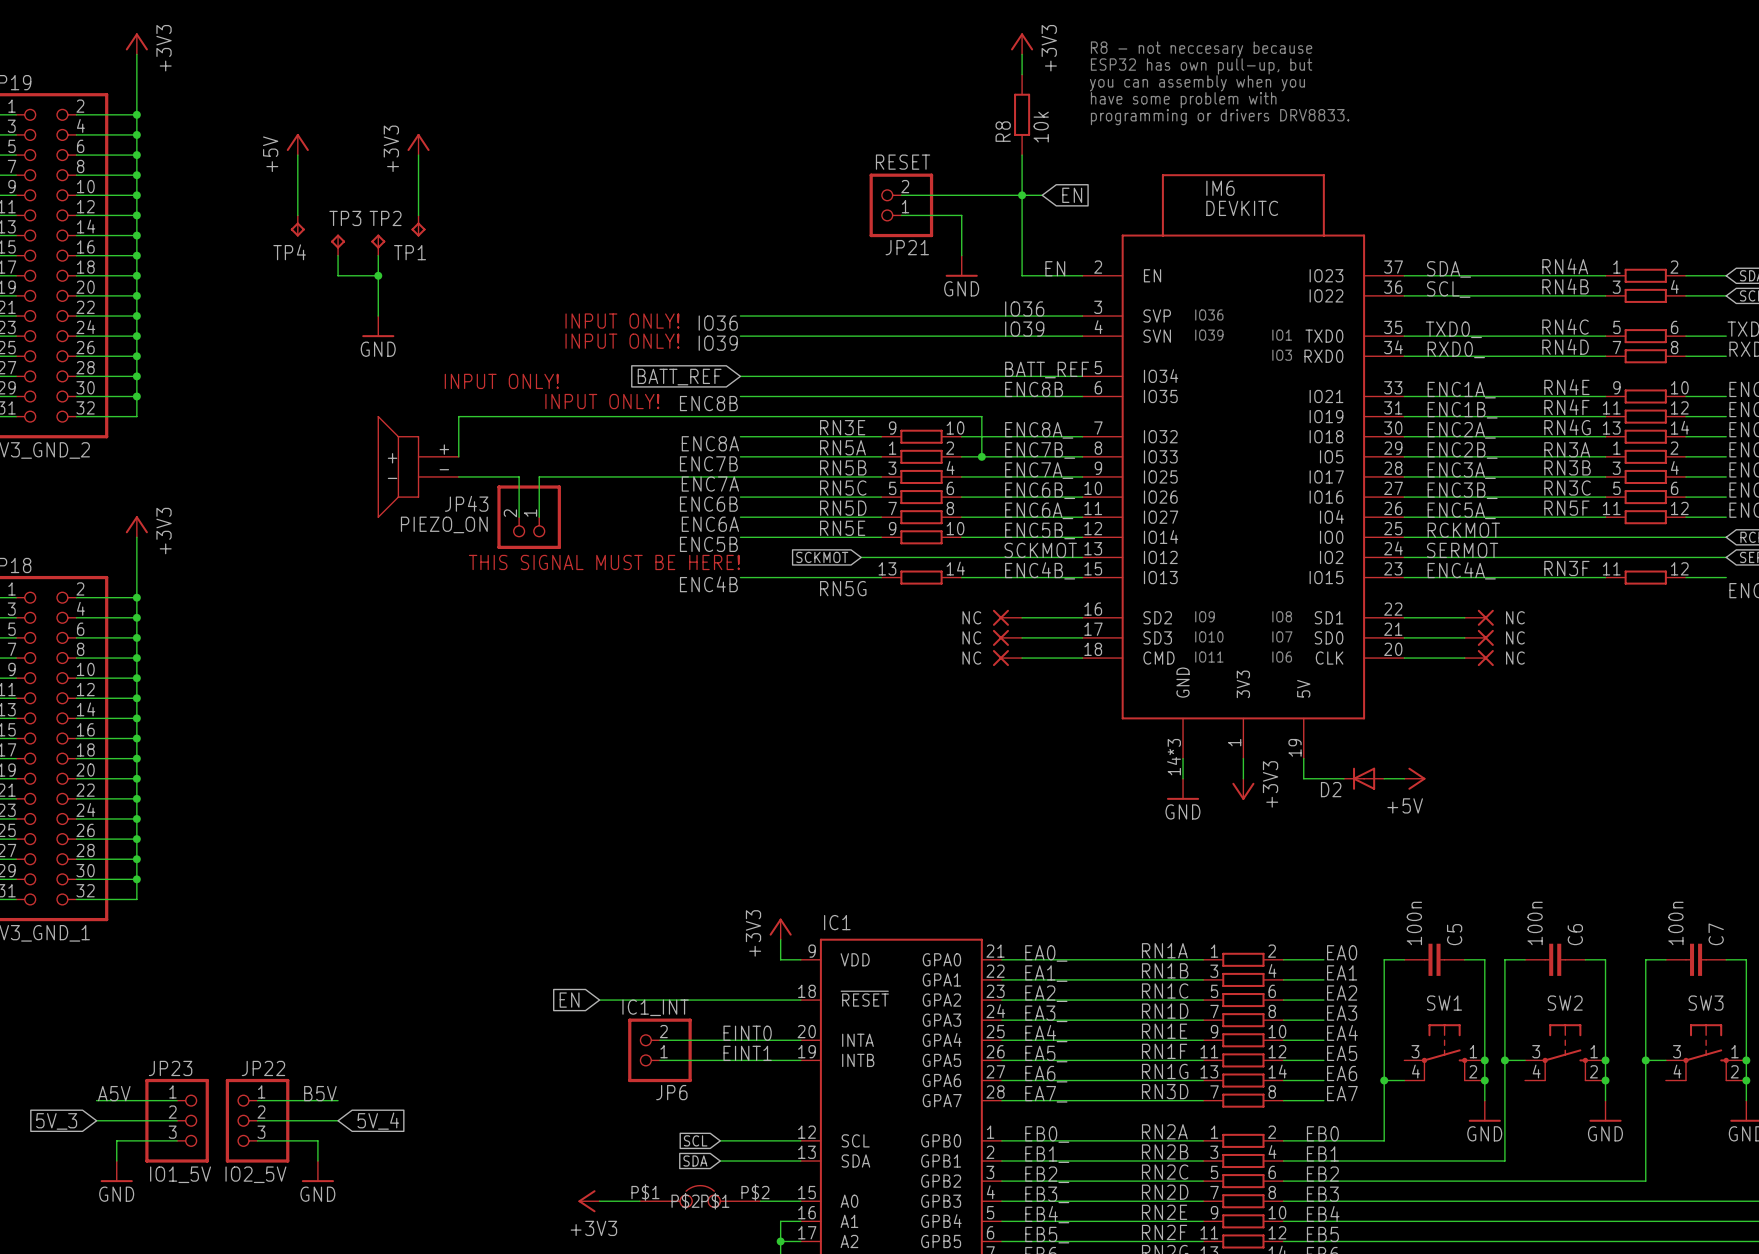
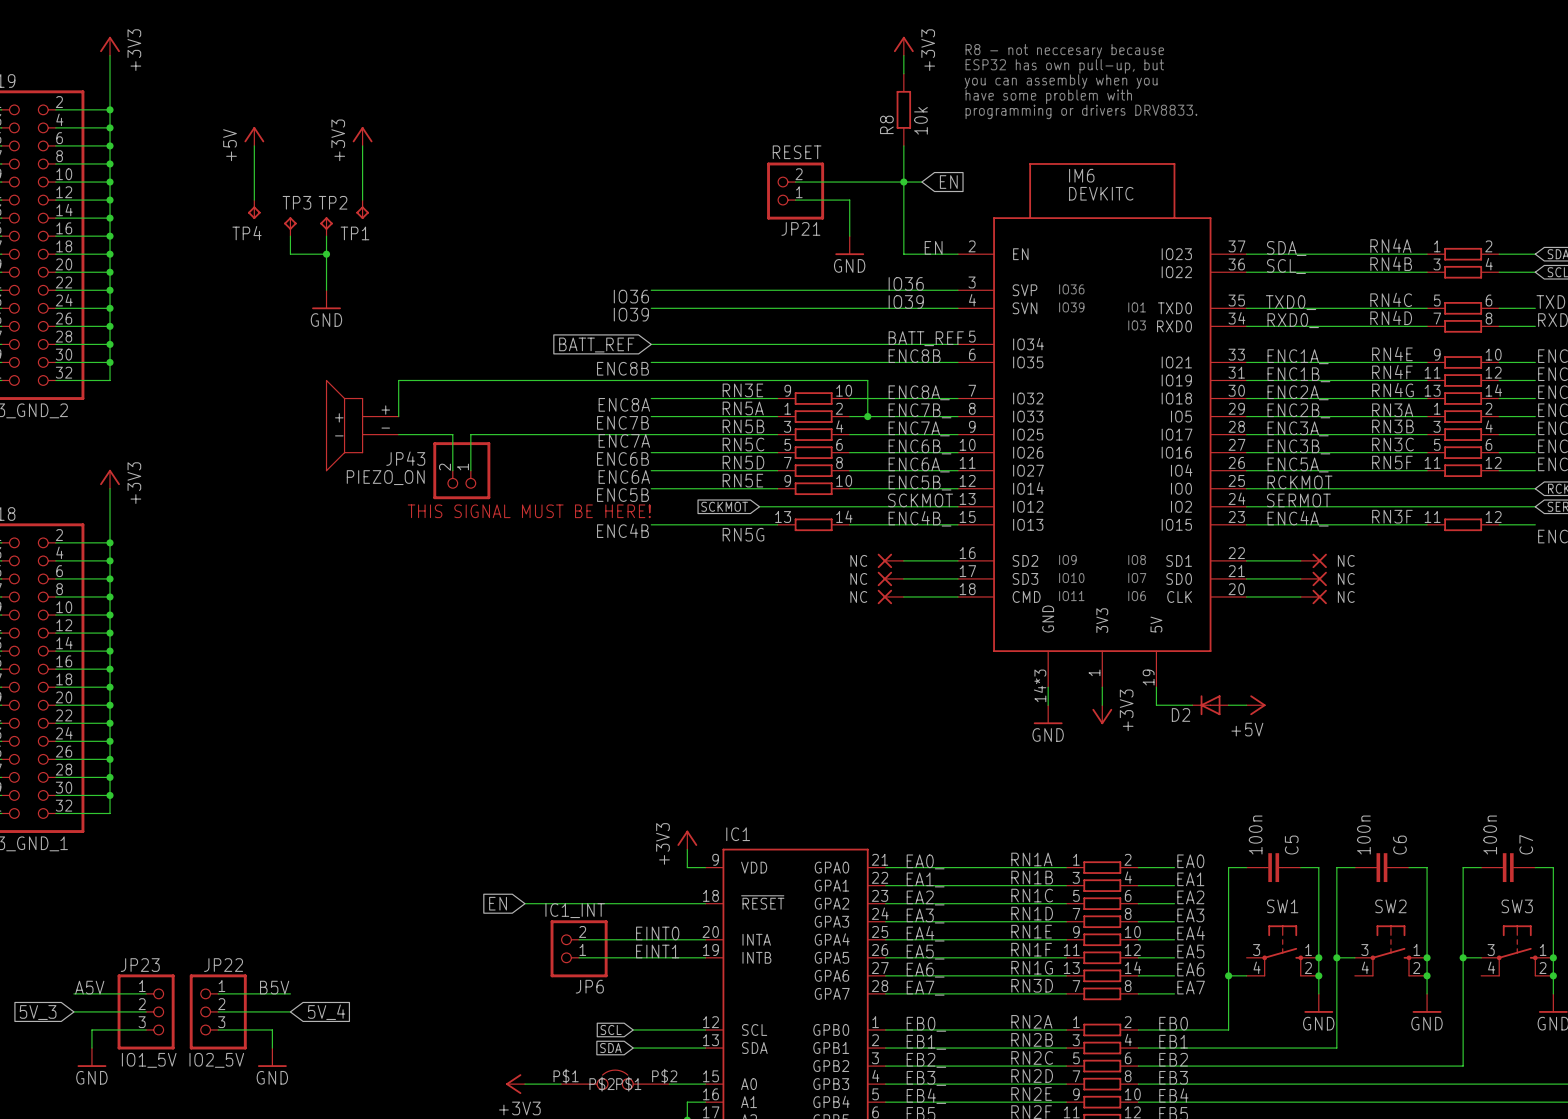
text: INPUT ONLY! (622, 321) -> none
text: INPUT ONLY! (622, 341) -> none
text: INPUT ONLY! (501, 381) -> none
text: INPUT ONLY! (602, 401) -> none

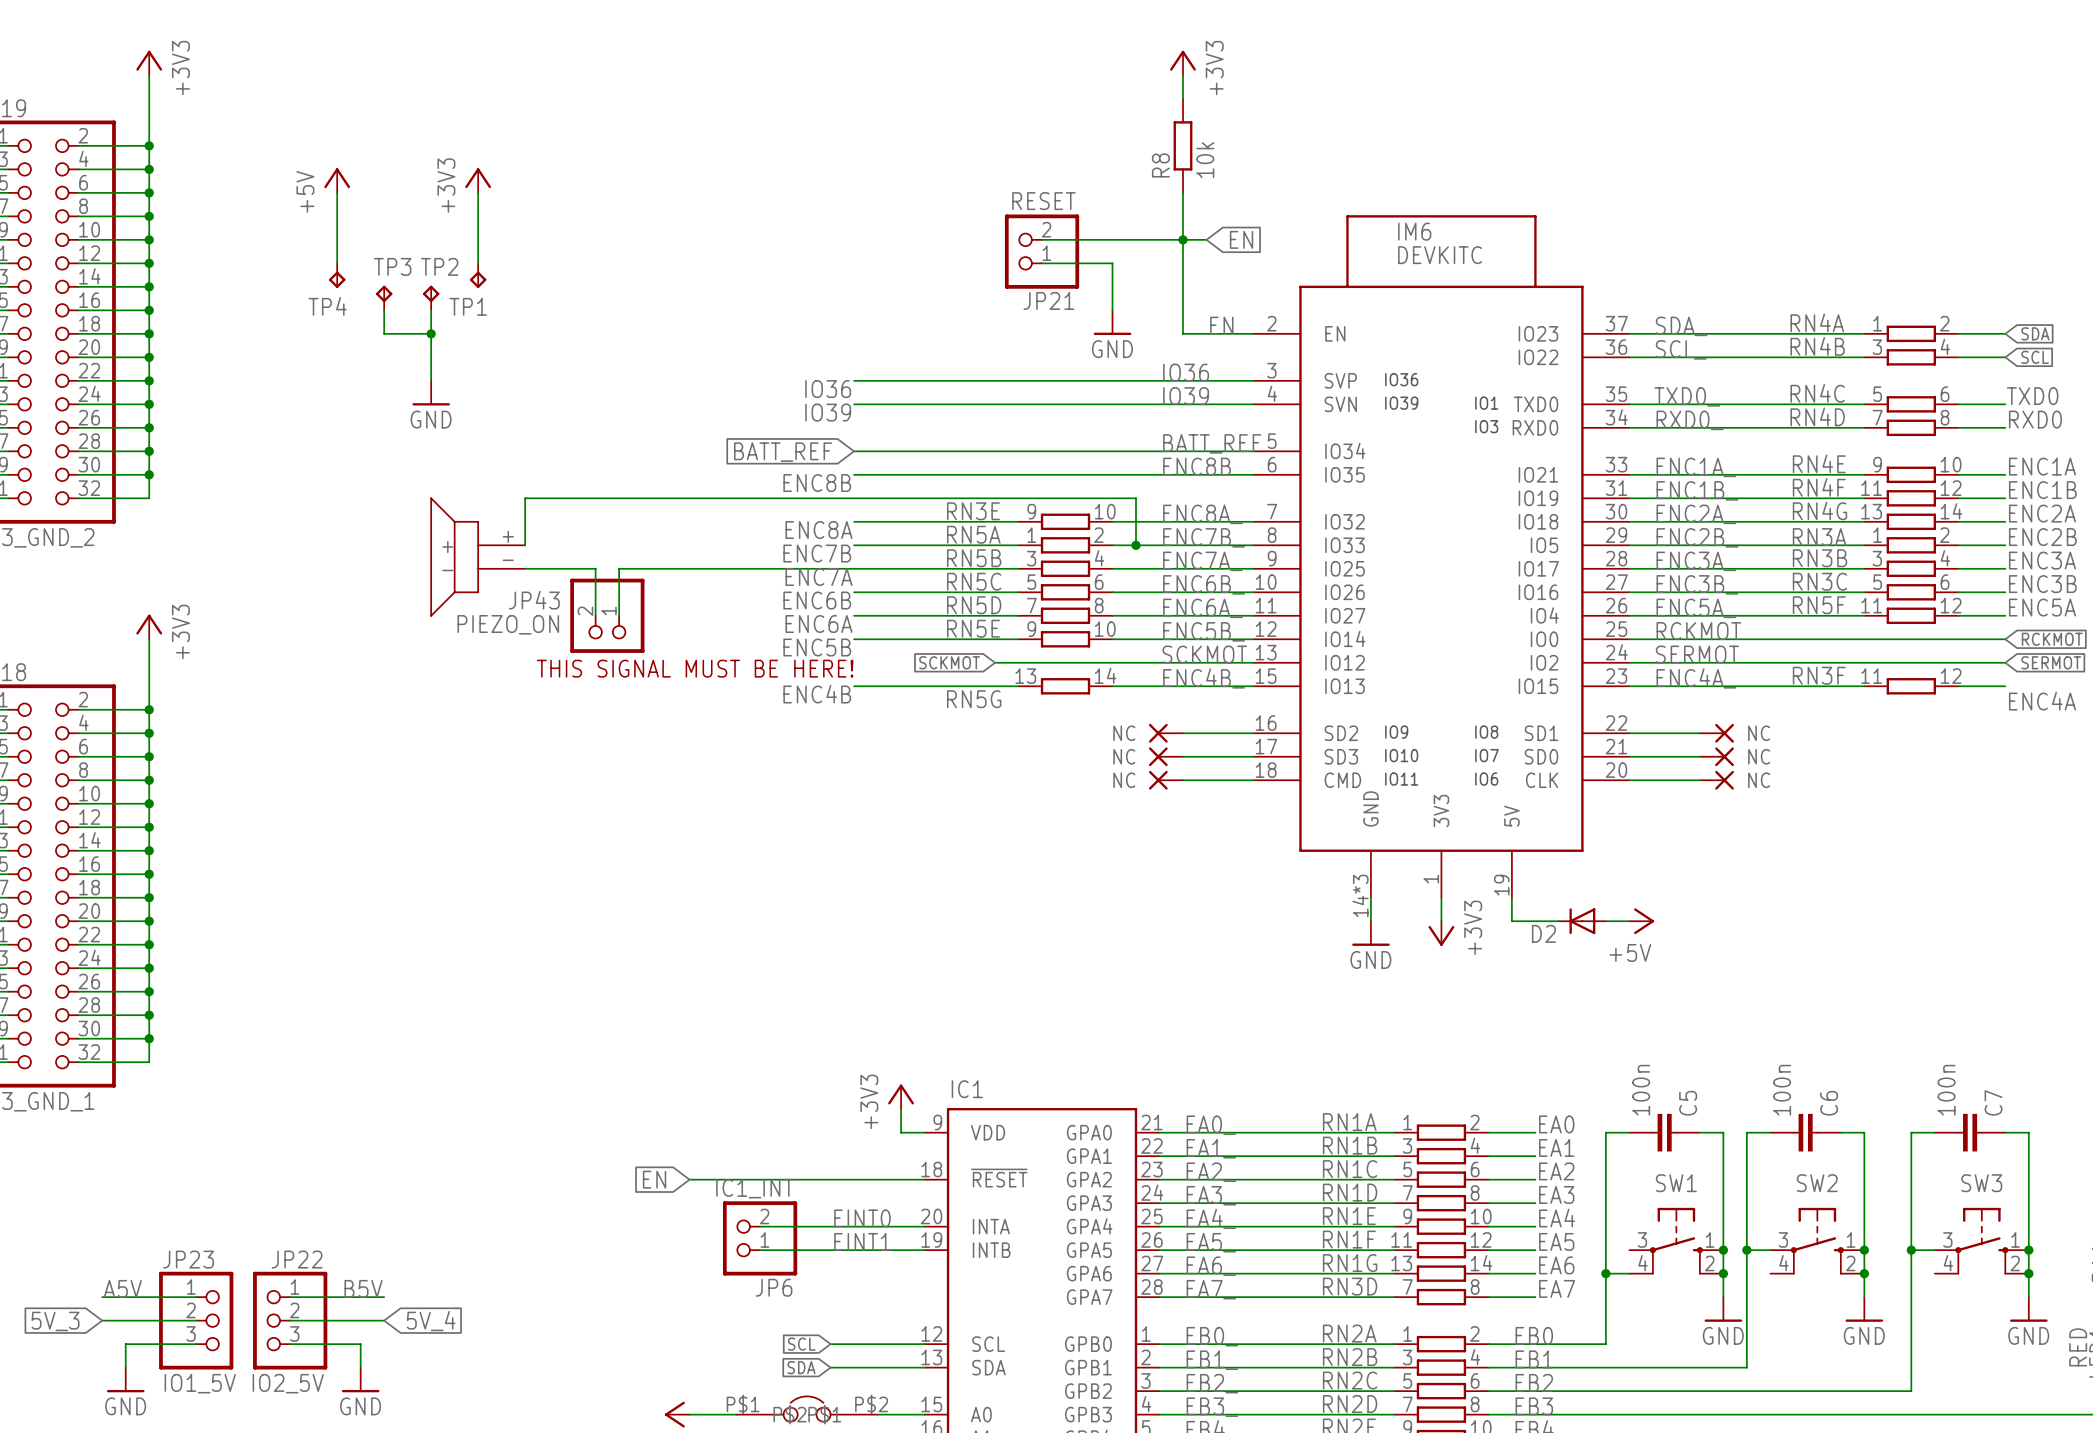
text: R8 - not neccesary because (1064, 51) -> none
text: ESP32 has own pull-up, but (1064, 66) -> none
text: you can assembly when you (1061, 81) -> none
text: have some problem with (1048, 96) -> none
text: programming or drivers DRV8833. (1081, 111) -> none

